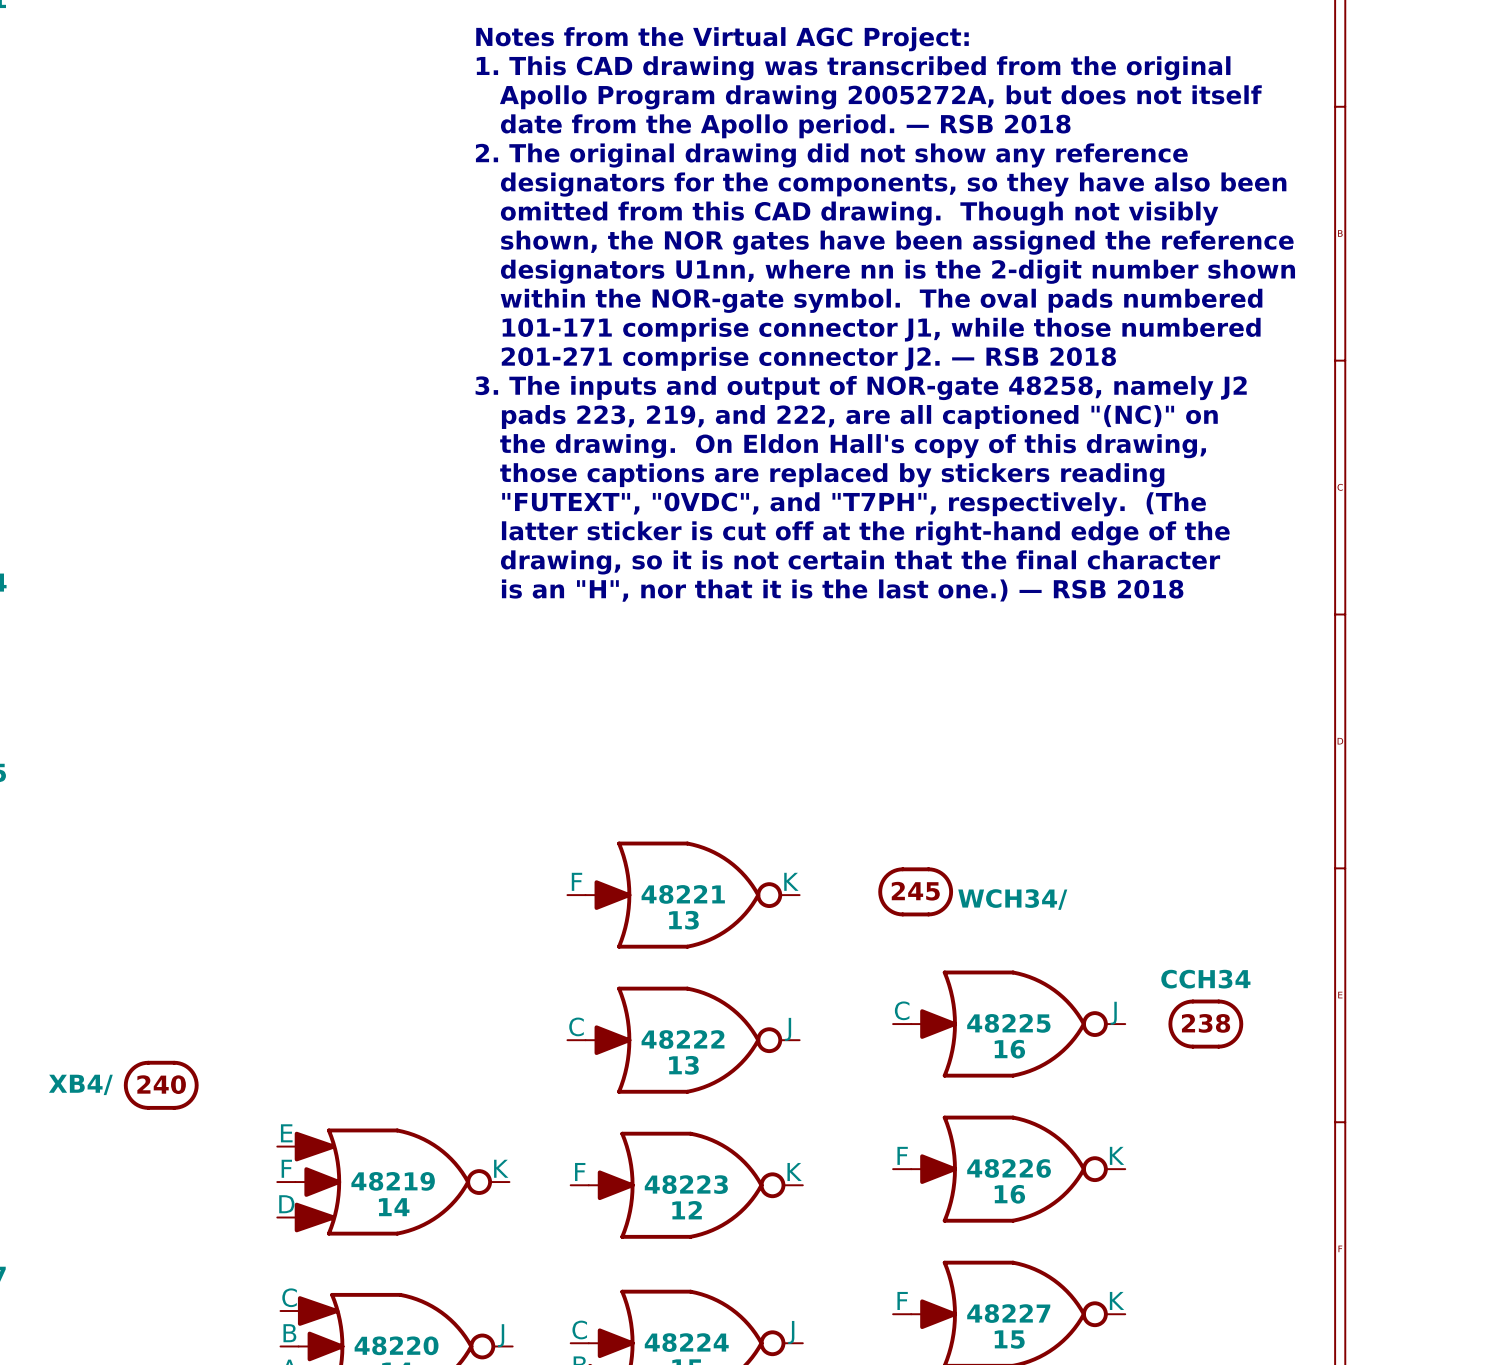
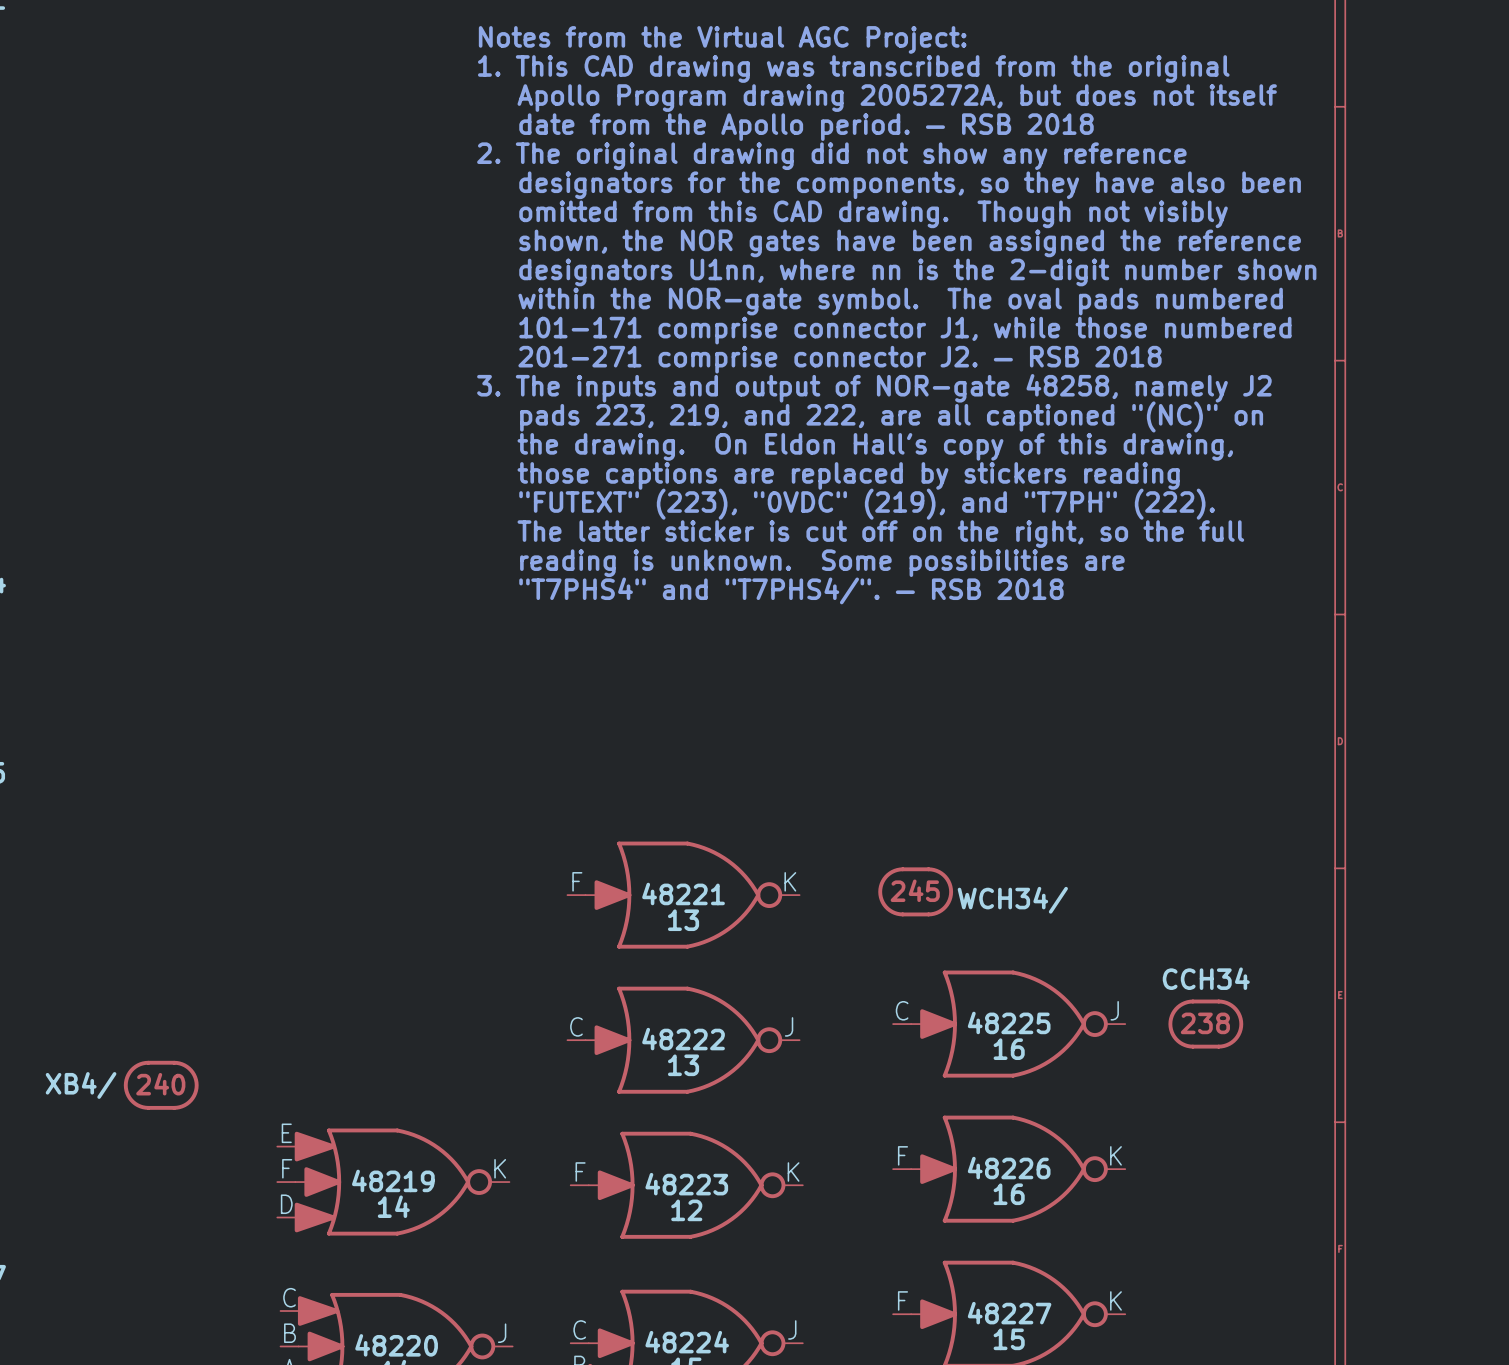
text: "FUTEXT", "0VDC", and "T7PH", respectively. (The (854, 504) -> "FUTEXT" (223), "0VDC" (219), and "T7PH" (222). (867, 504)
text: latter sticker is cut off at the right-hand edge of the (865, 533) -> The latter sticker is cut off on the right, so the full (880, 534)
text: drawing, so it is not certain that the final character (860, 562) -> reading is unknown. Some possibilities are (822, 563)
text: is an "H", nor that it is the last one.) — RSB 2018 (842, 590) -> "T7PHS4" and "T7PHS4/". — RSB 2018 (791, 590)

